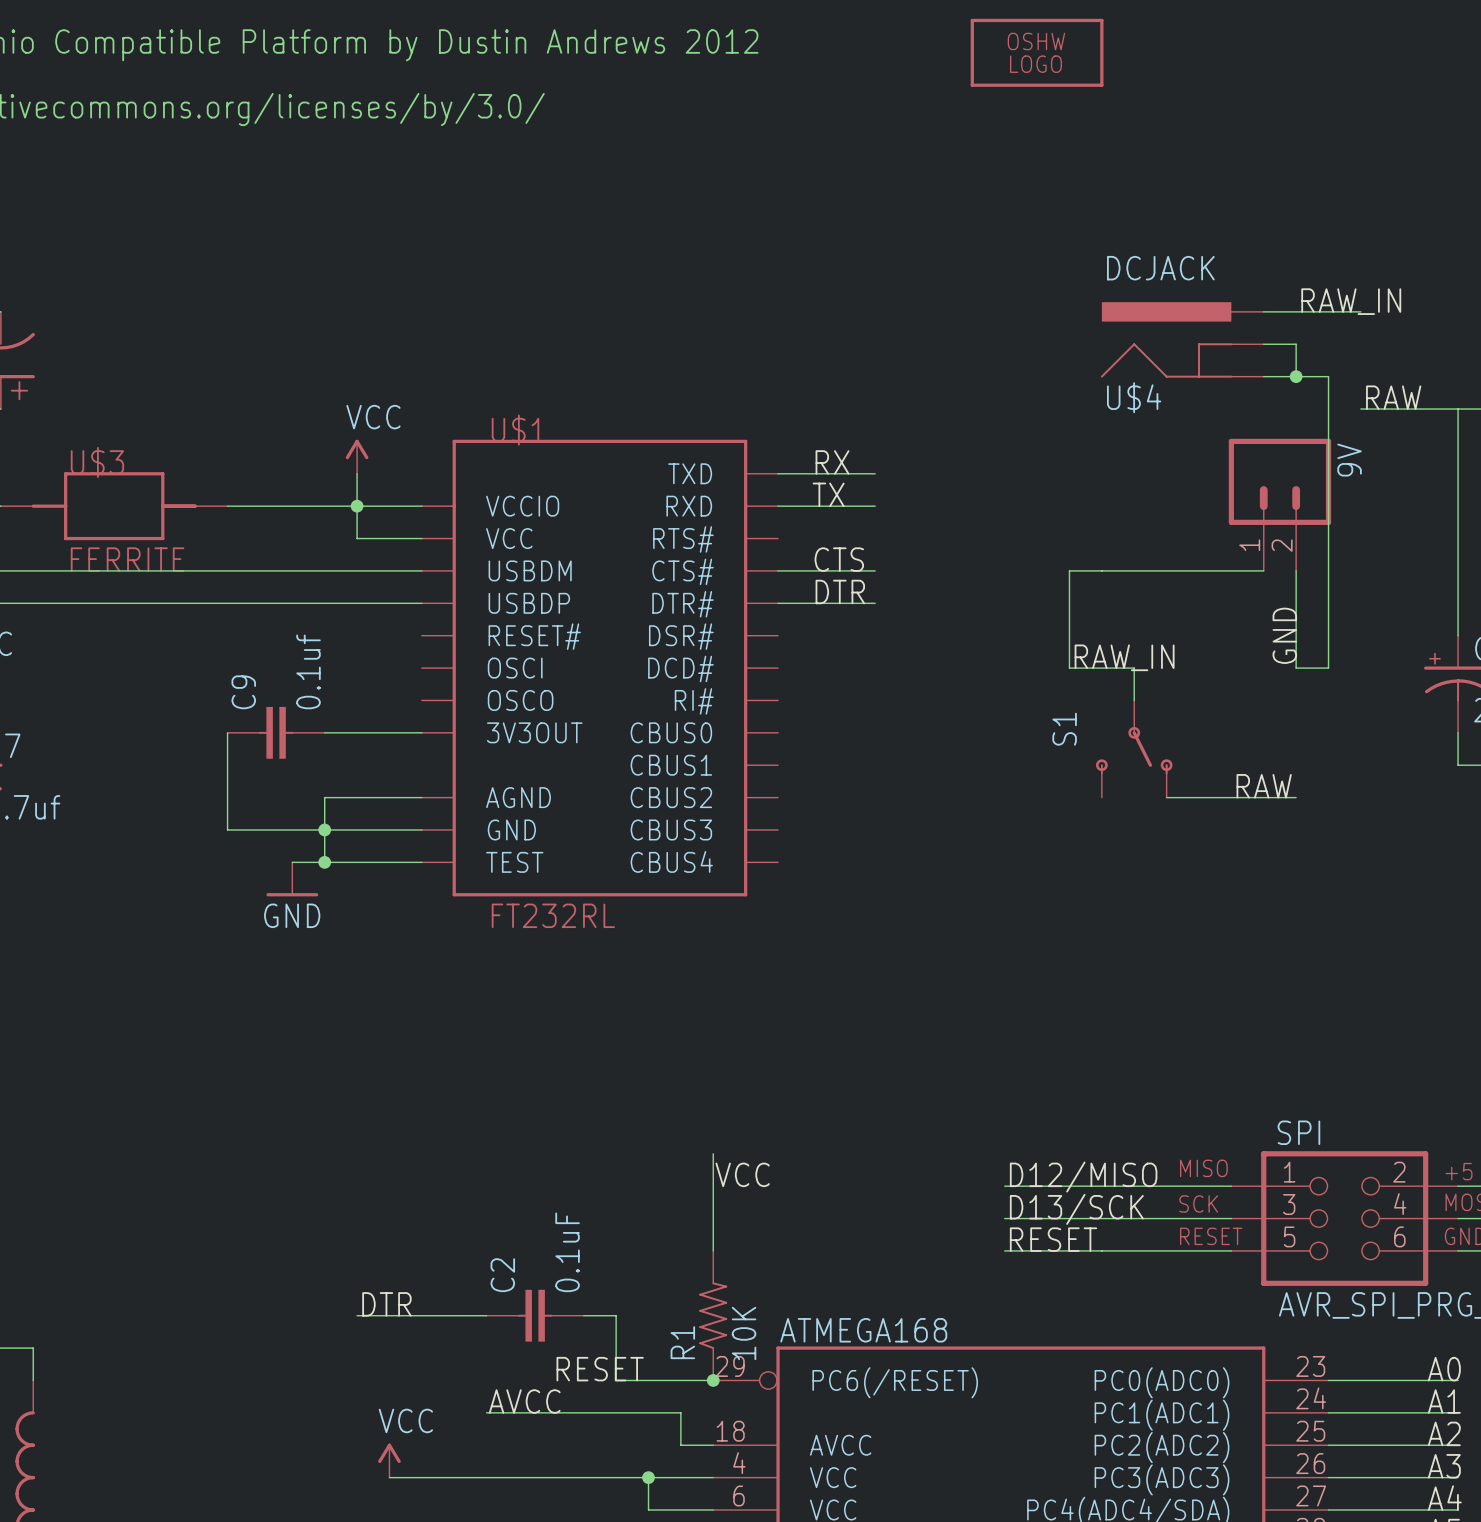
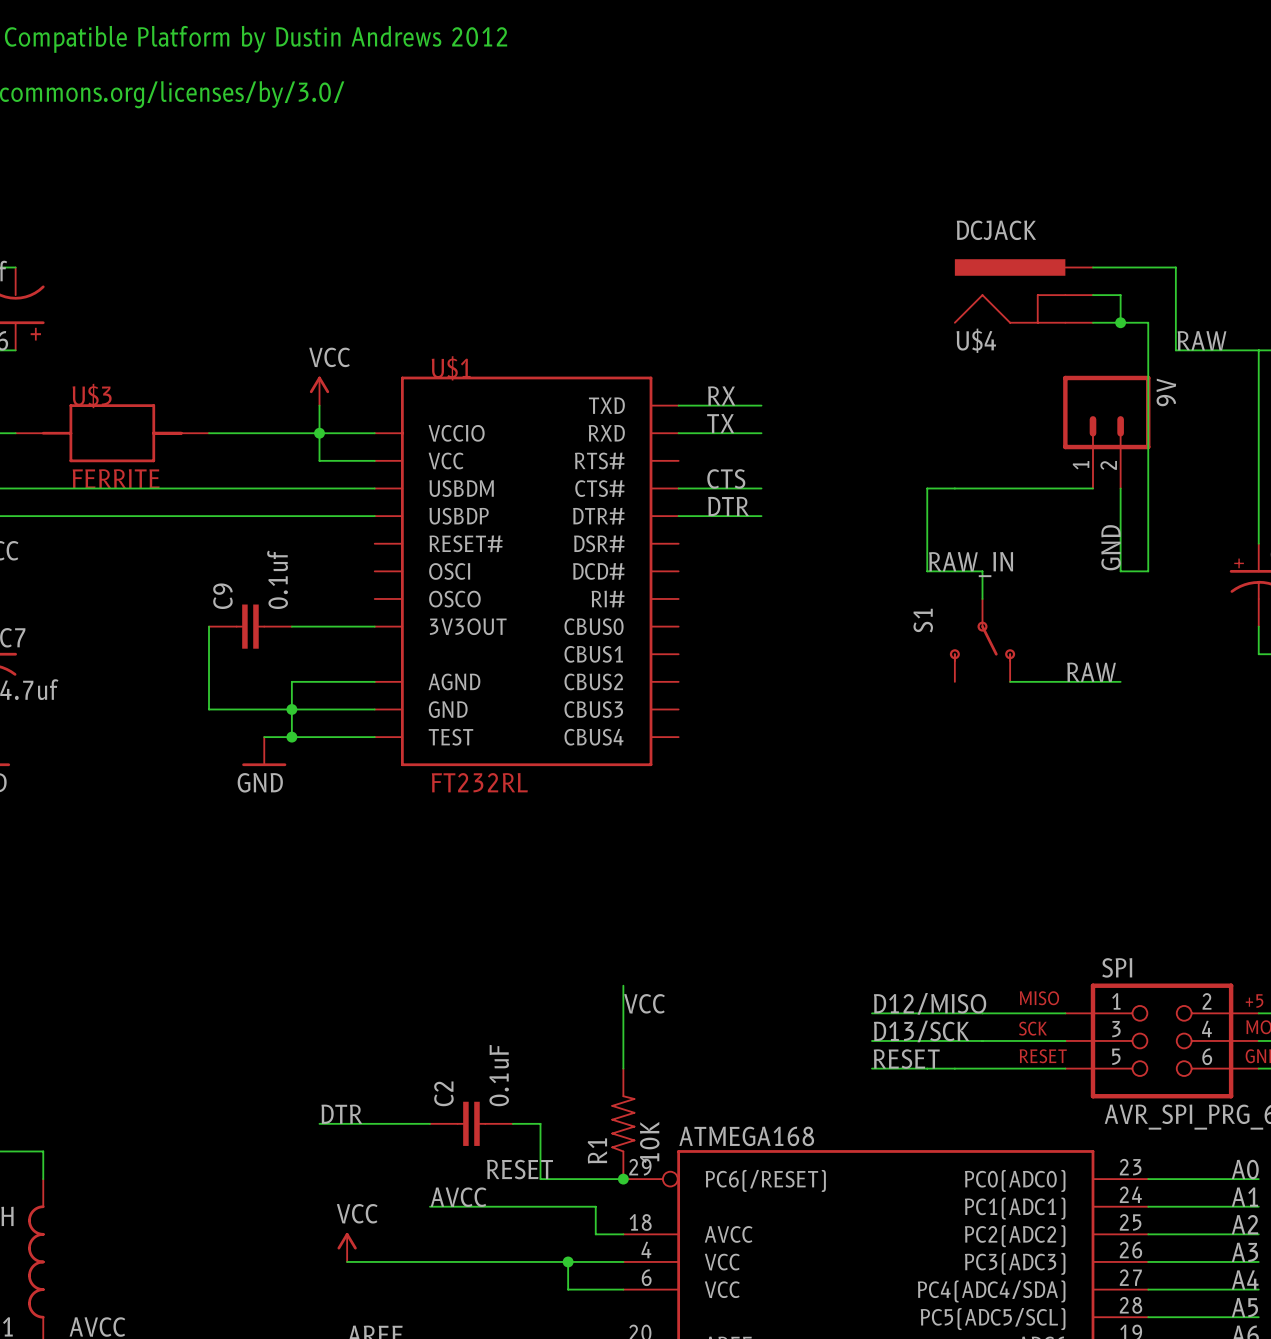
part: (1037, 52) -> none
label: RAW_IN (1351, 301) -> none
wire: none -> (1175, 267) (1175, 350)

